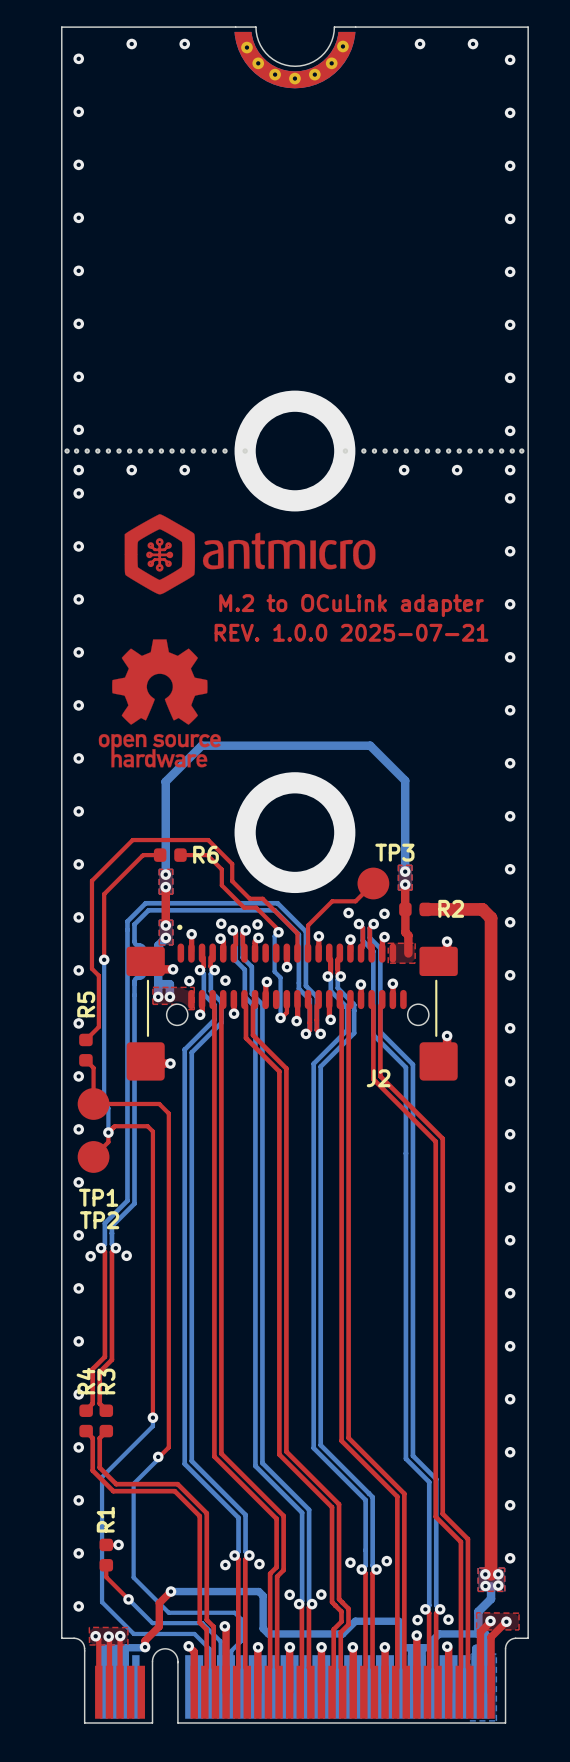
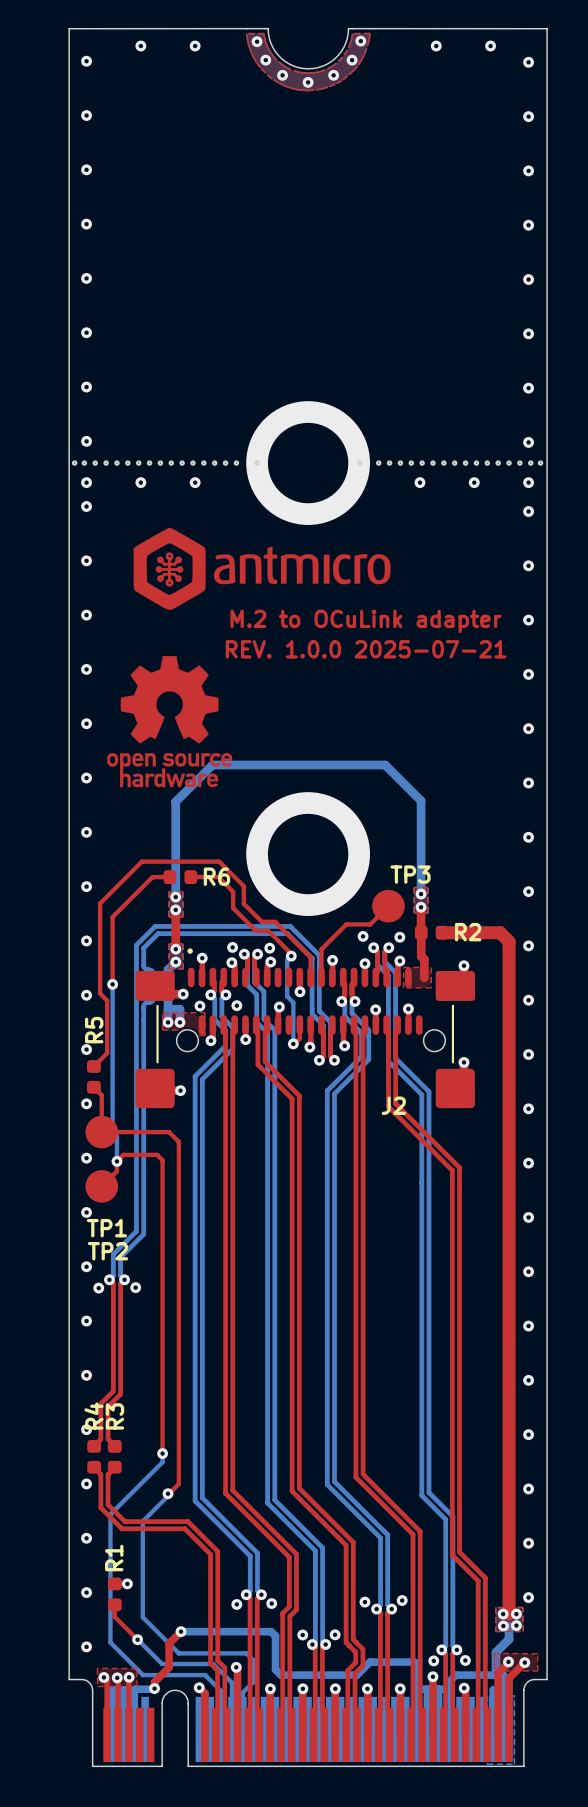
top zone outline: none -> (370, 33) (369, 39) (367, 45) (361, 60) (349, 74) (329, 86) (308, 90) (284, 85) (267, 75) (253, 57) (246, 33) (264, 33) (269, 50) (277, 60) (291, 69) (308, 73) (325, 69) (336, 63) (347, 50) (352, 33) (370, 33)
via: none -> (257, 41)
via: none -> (360, 41)
via: none -> (265, 60)
via: none -> (352, 60)
part: (294, 60) -> none
via: none -> (282, 75)
via: none -> (333, 75)
via: none -> (308, 82)

